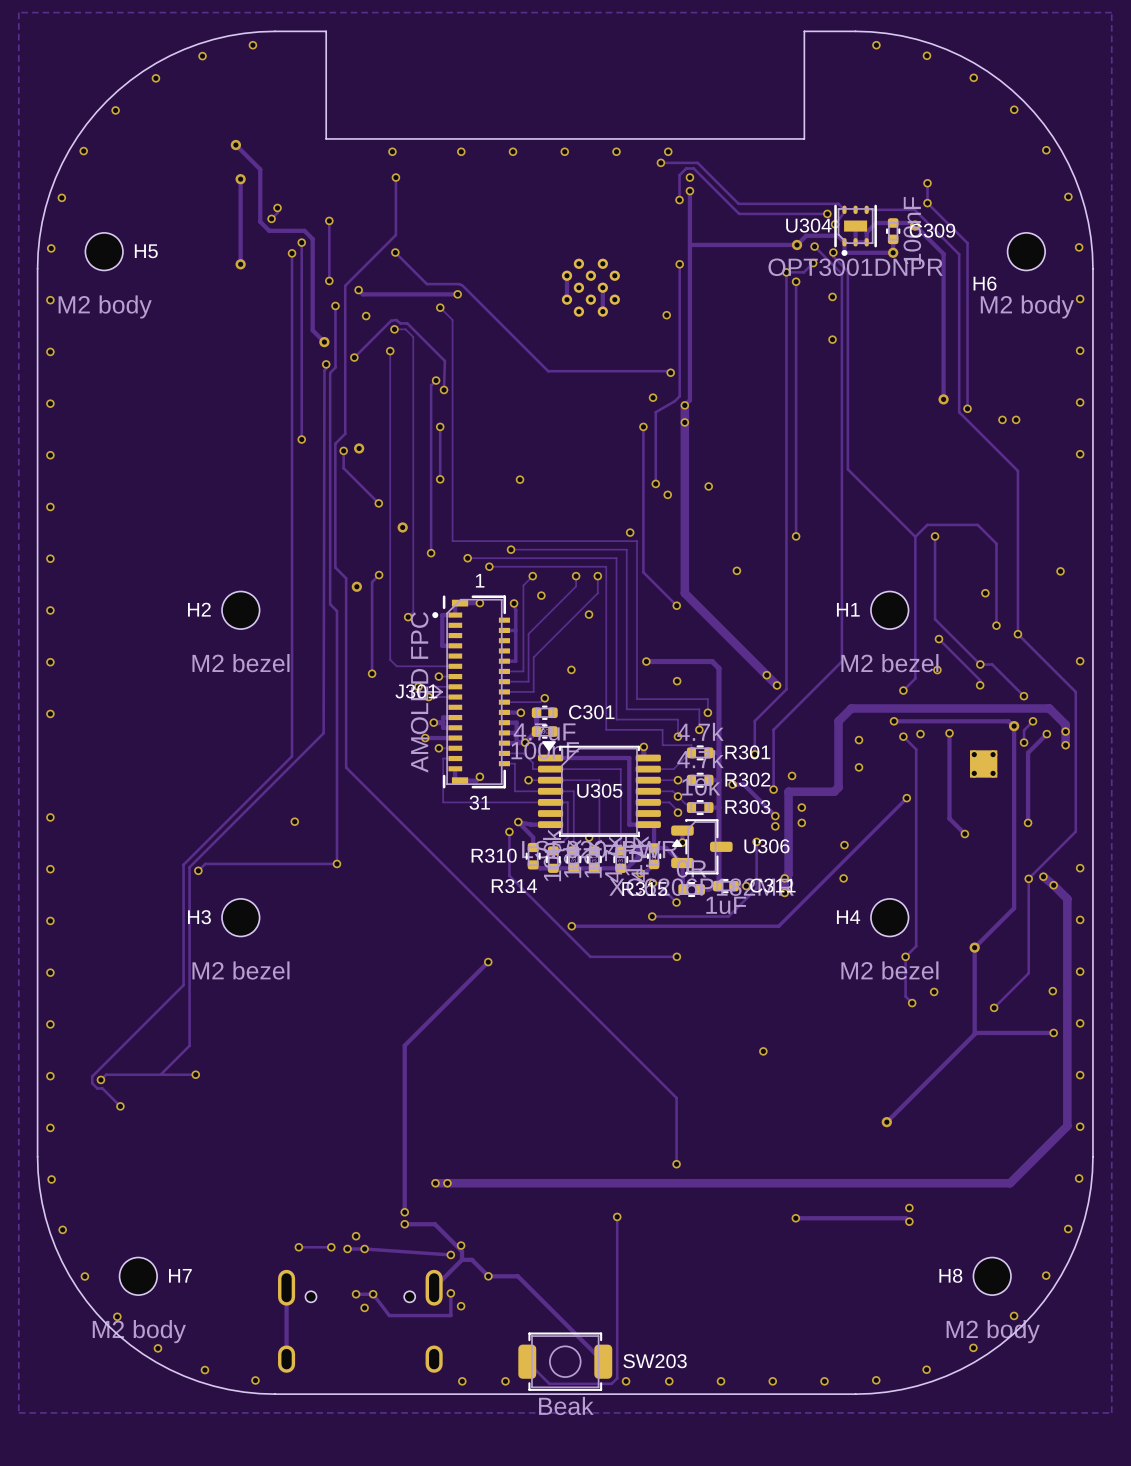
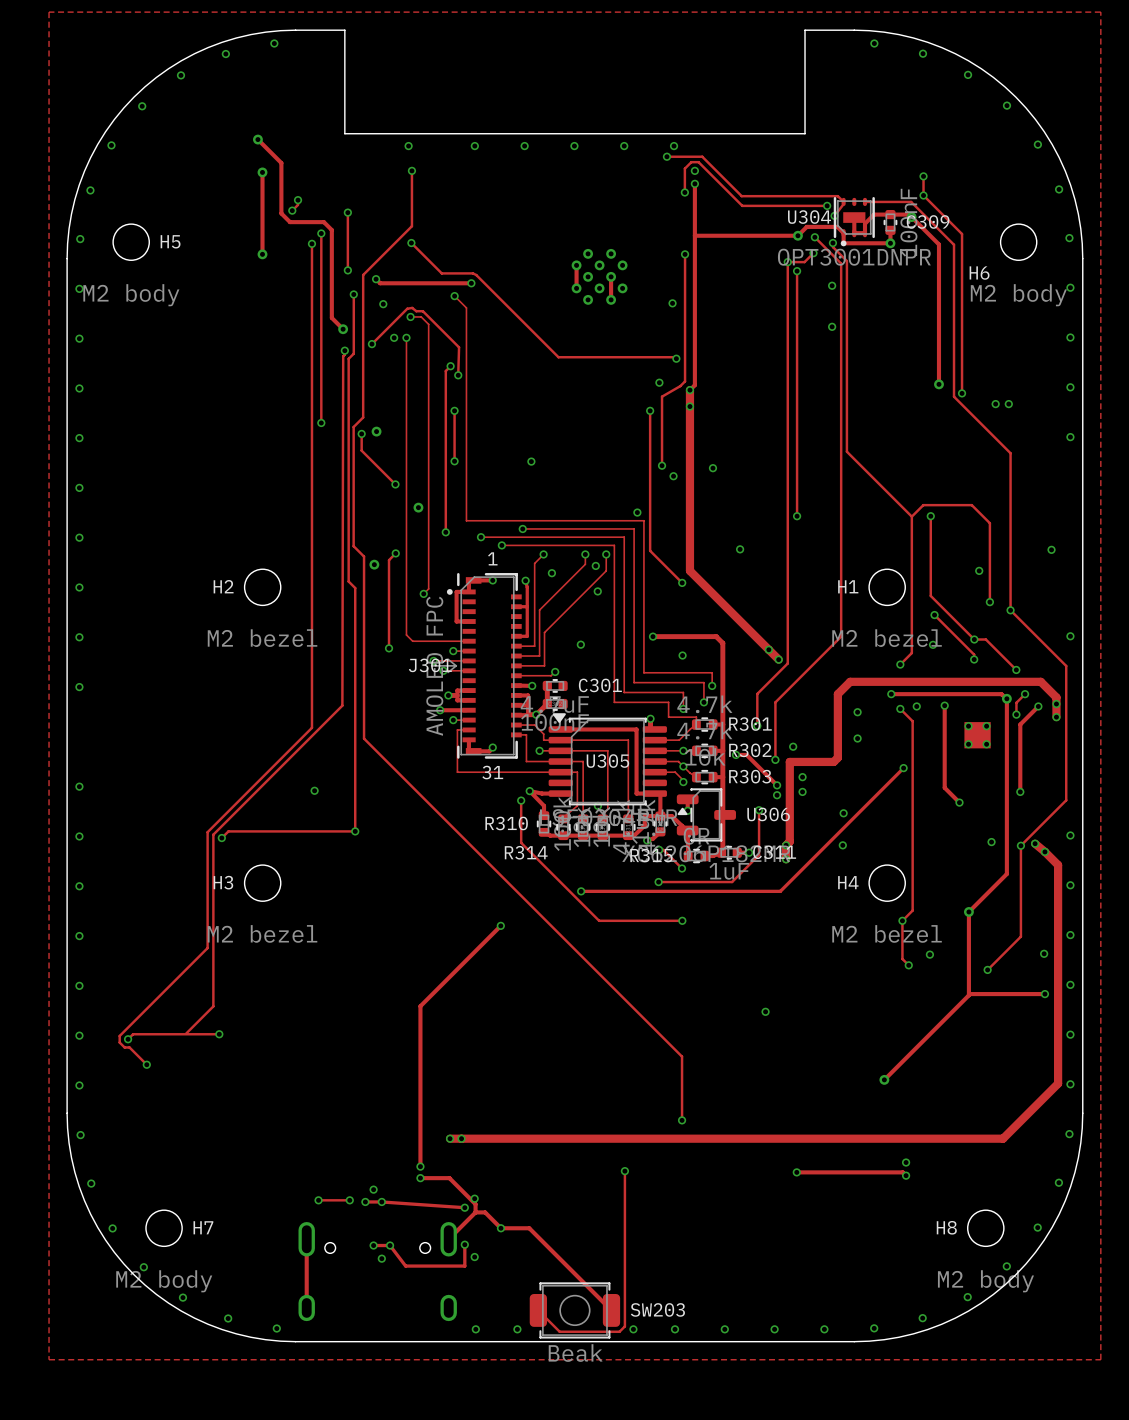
via: none -> (394, 337)
via: none -> (595, 565)
via: none -> (991, 842)

